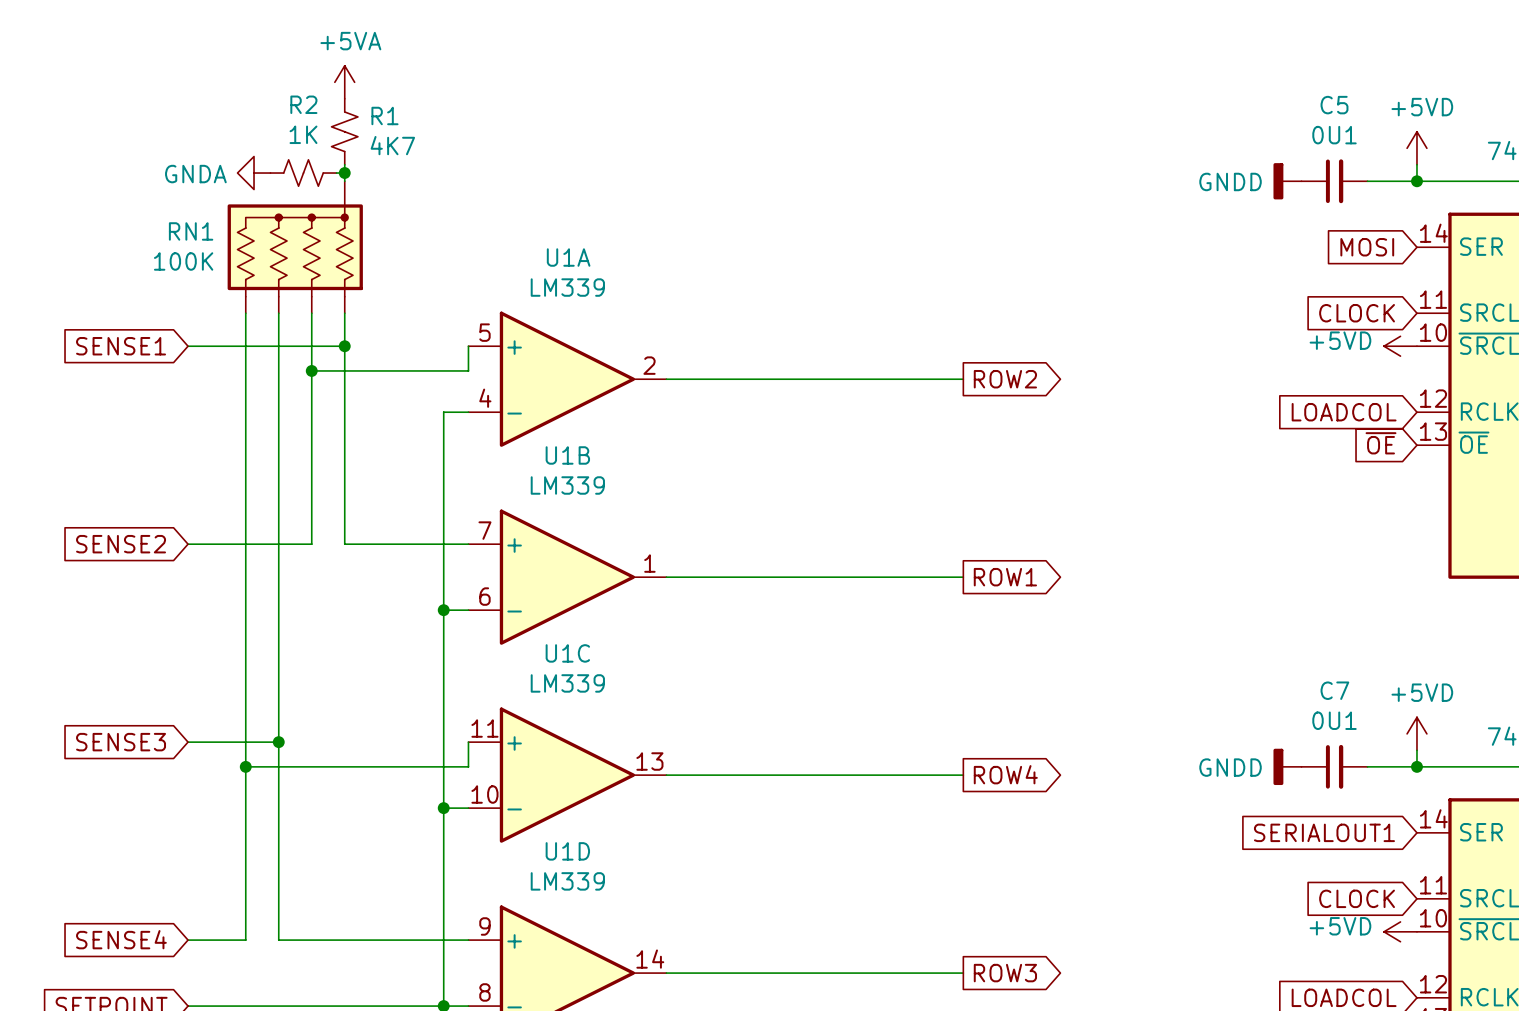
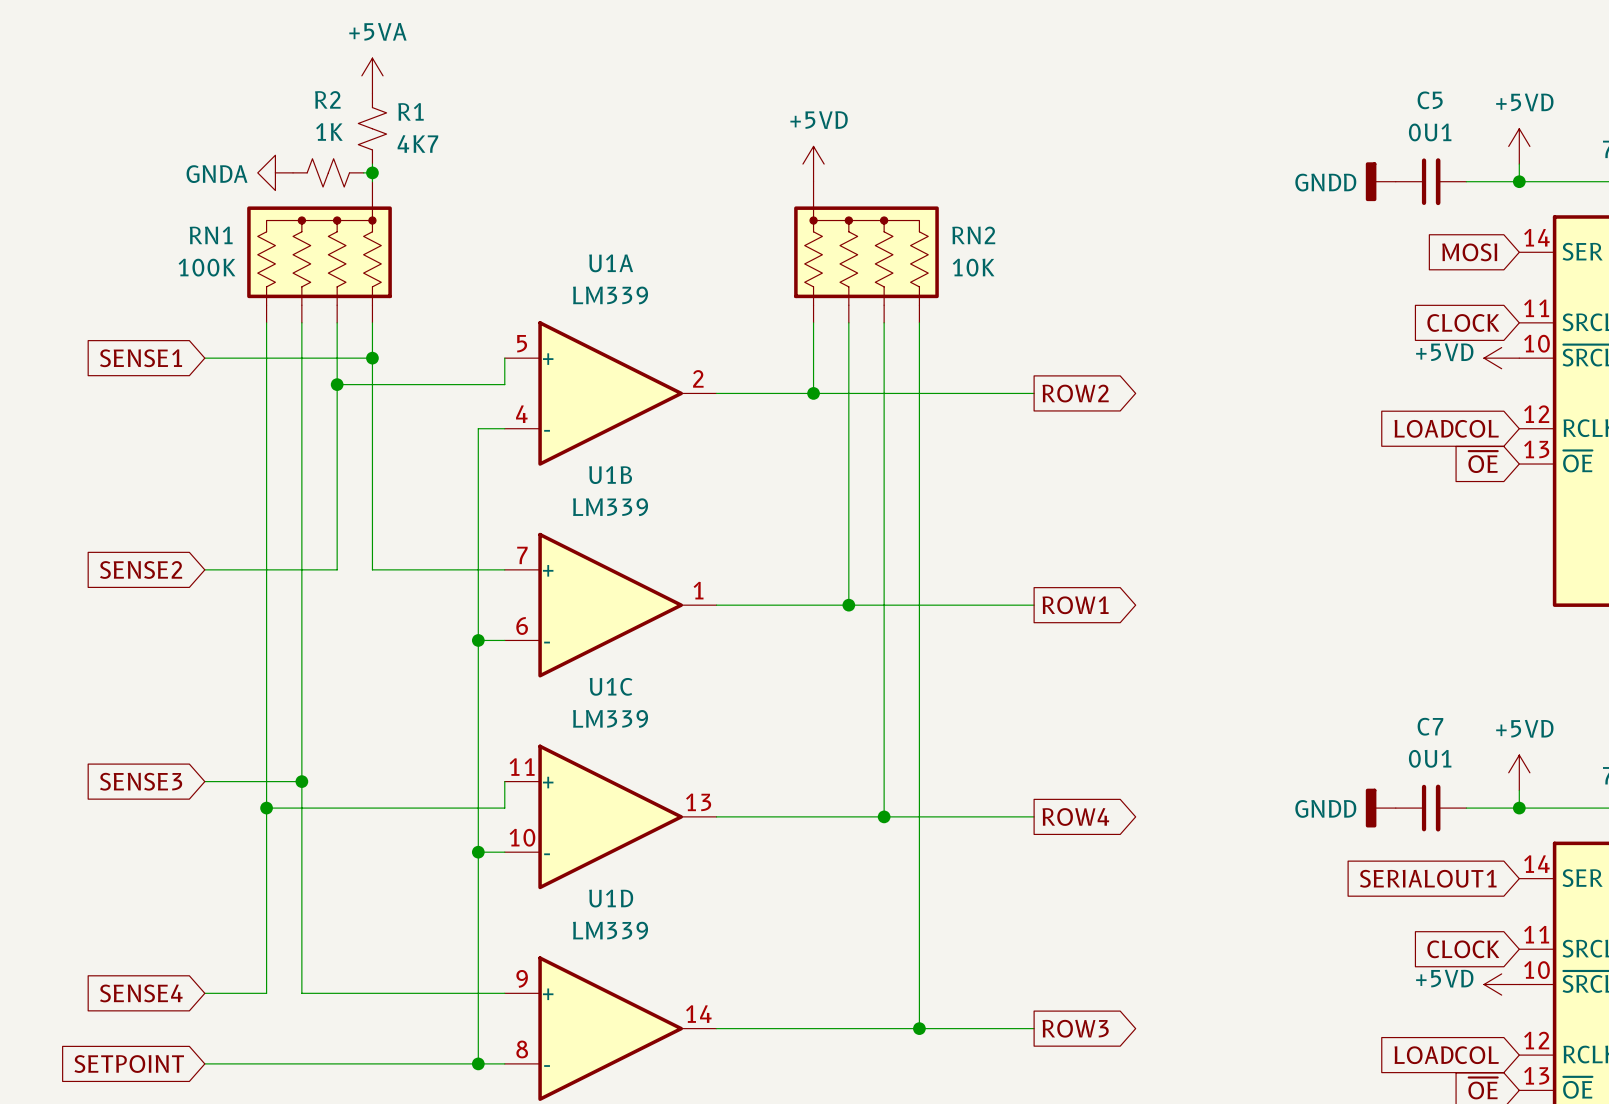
power symbol: none -> +5VD (813, 164)
RN2: none -> 10K (866, 252)
wire: none -> (813, 322) (813, 393)
wire: none -> (848, 322) (848, 605)
wire: none -> (884, 322) (884, 816)
wire: none -> (919, 322) (919, 1028)
junction: none -> (813, 393)
junction: none -> (848, 605)
junction: none -> (884, 816)
junction: none -> (919, 1028)

